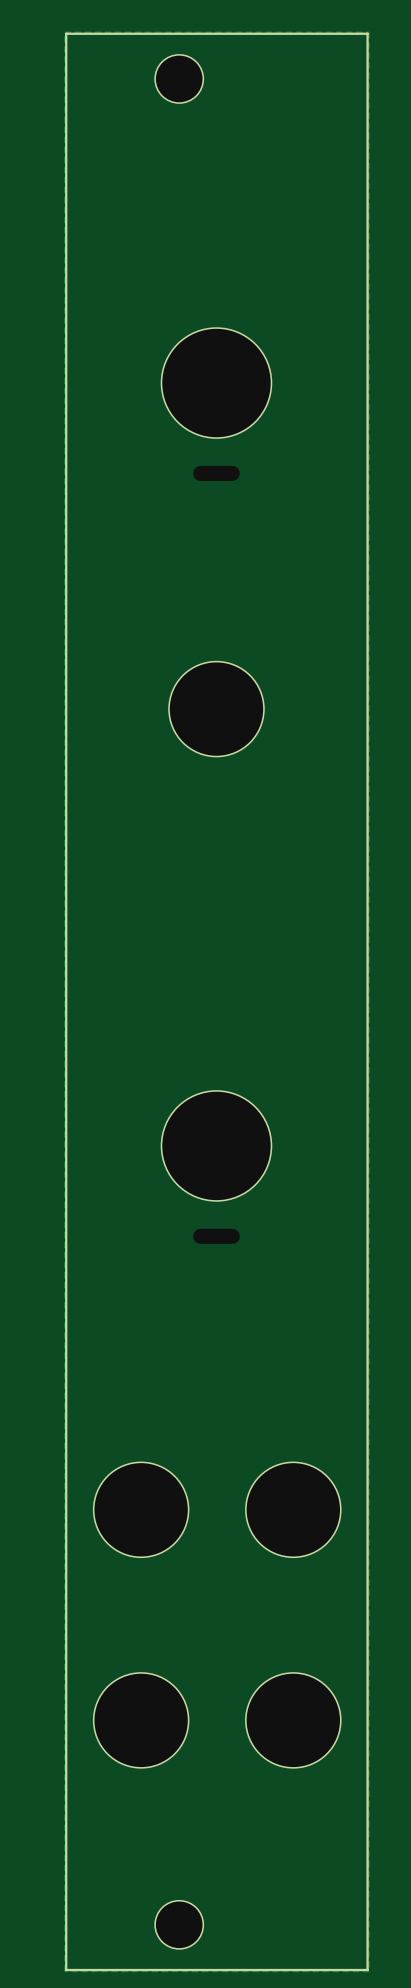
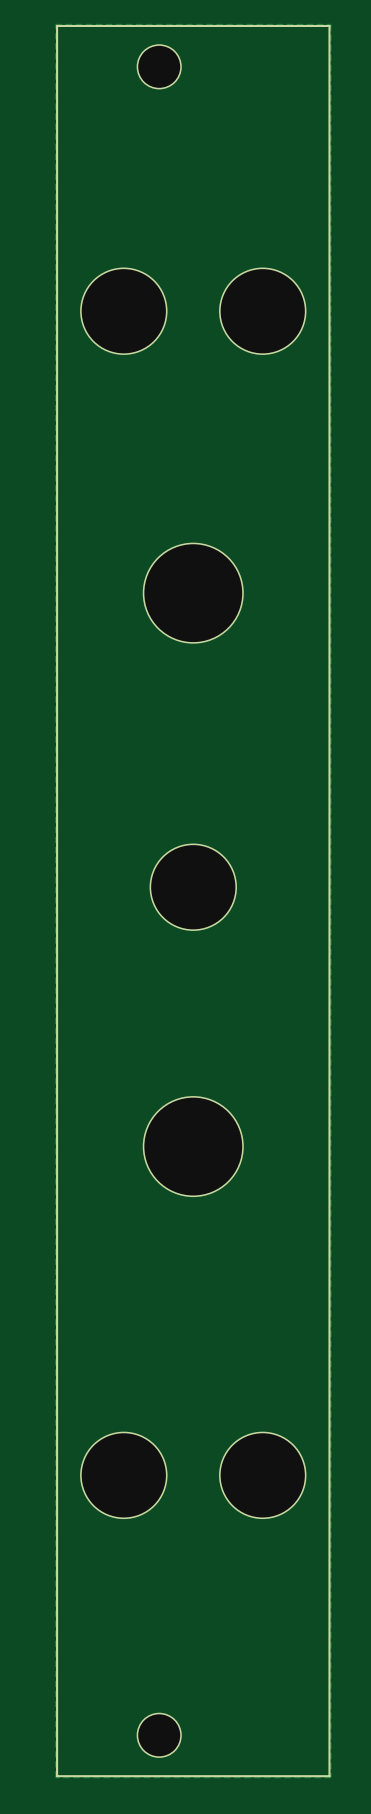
part: none -> (123, 311)
part: none -> (262, 311)
part: (216, 404) -> none
part: none -> (193, 593)
part: (216, 709) -> none
part: none -> (193, 887)
part: (216, 1167) -> none
part: none -> (193, 1146)
part: (141, 1509) -> none
part: (293, 1509) -> none
part: none -> (123, 1475)
part: none -> (262, 1475)
part: (141, 1720) -> none
part: (293, 1720) -> none

